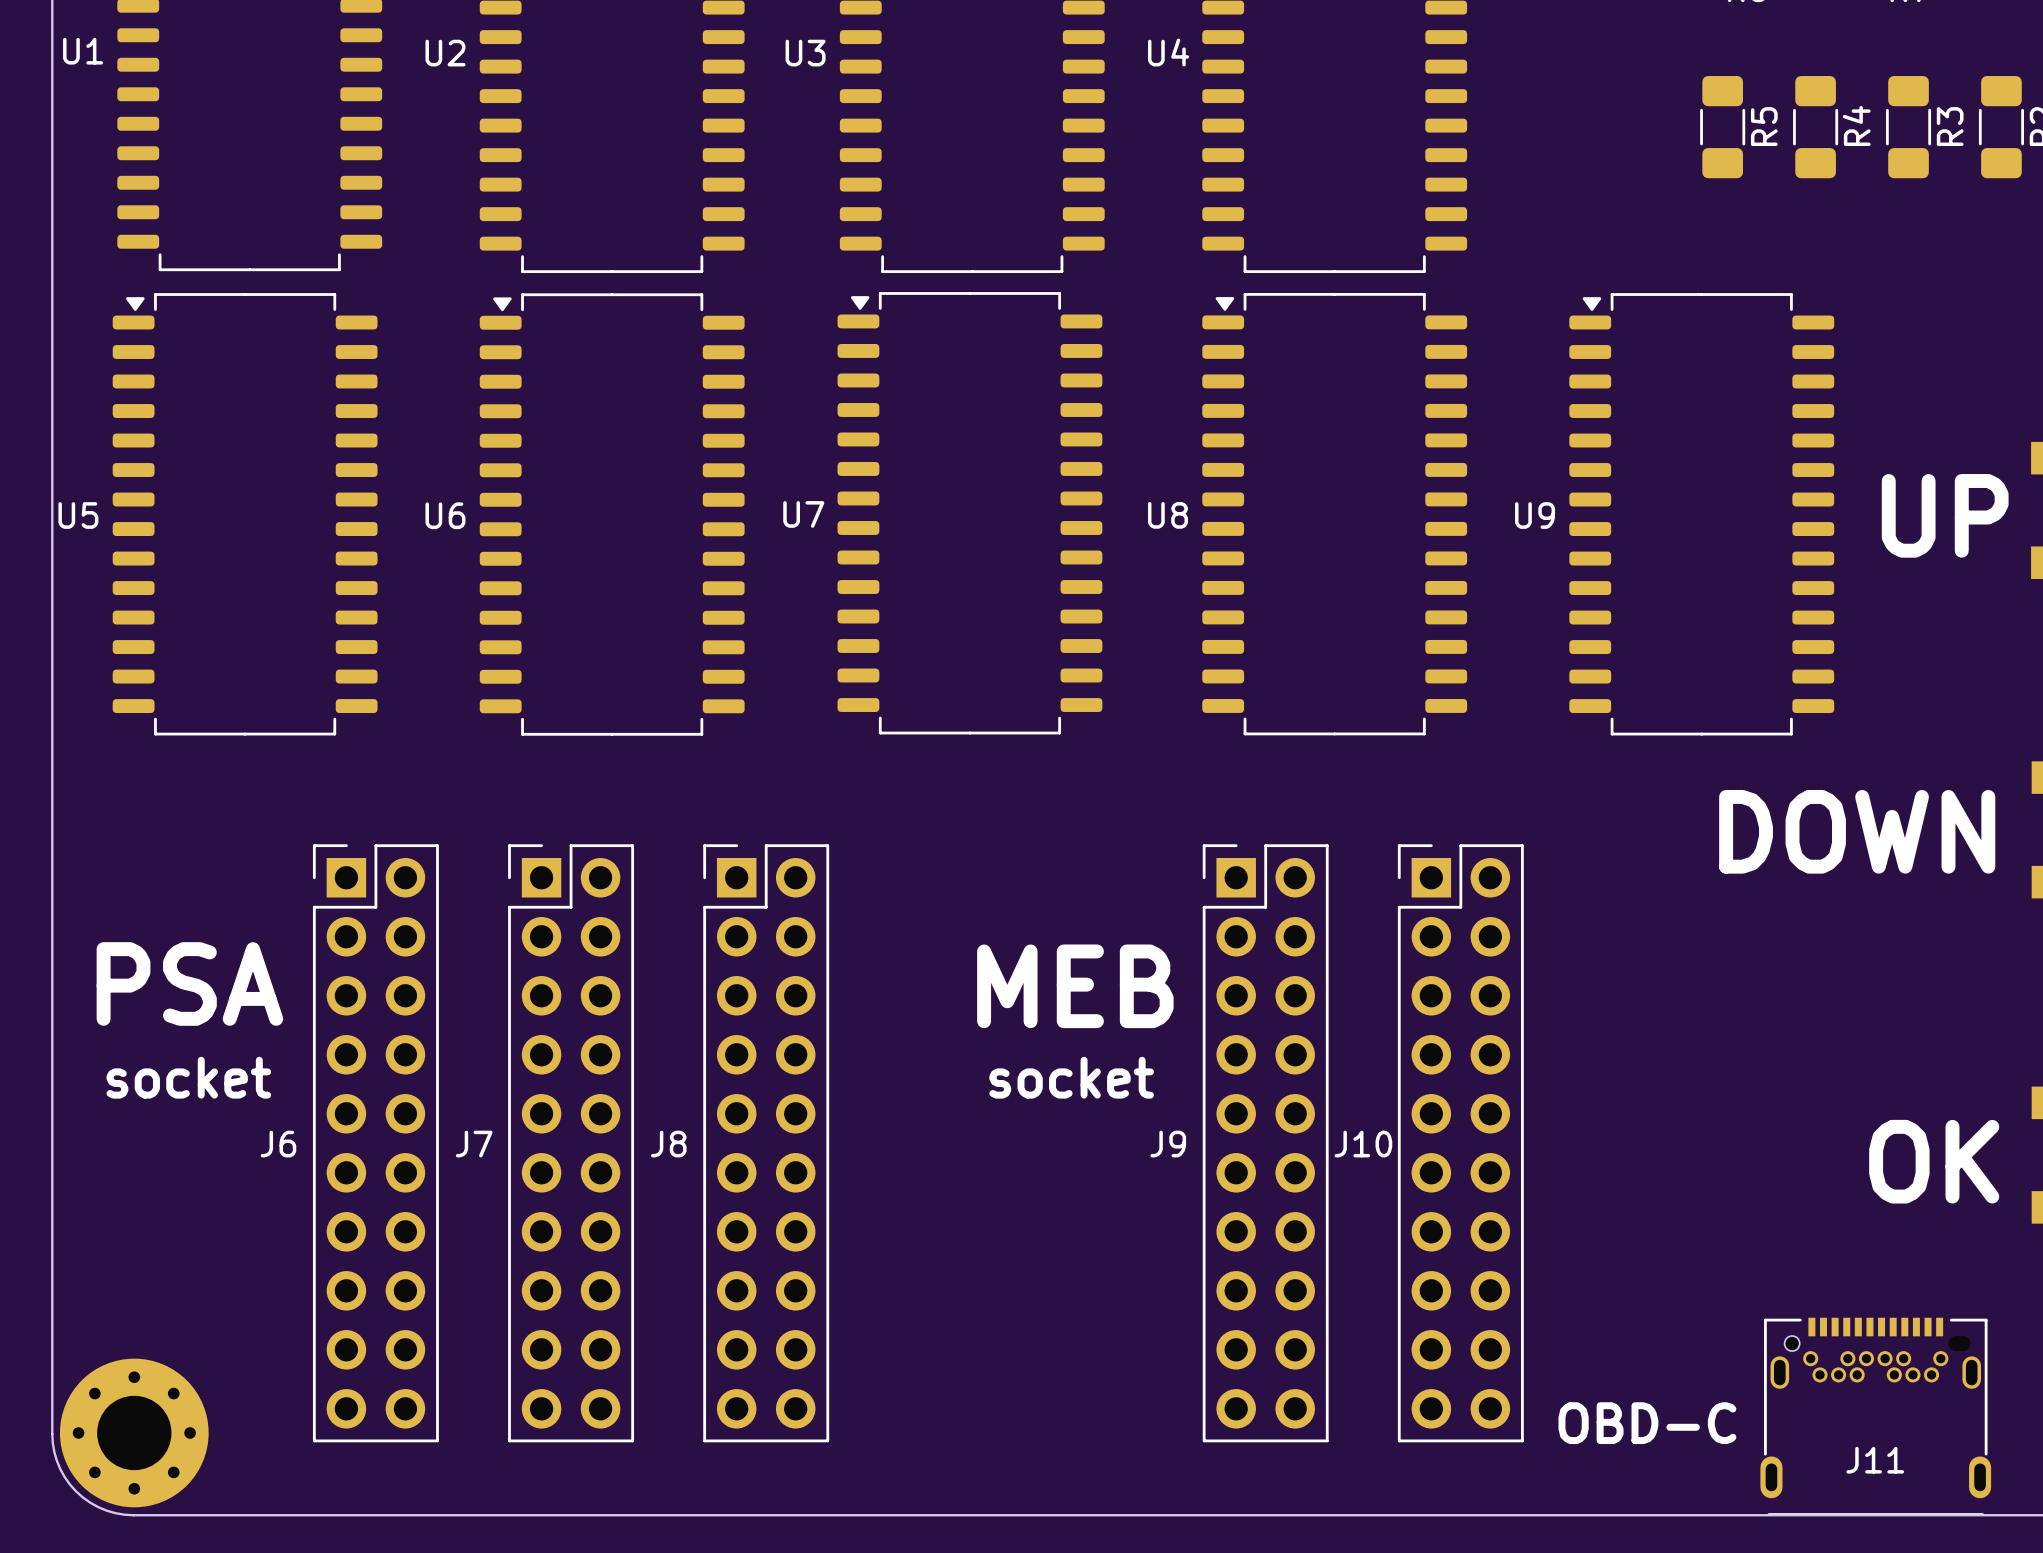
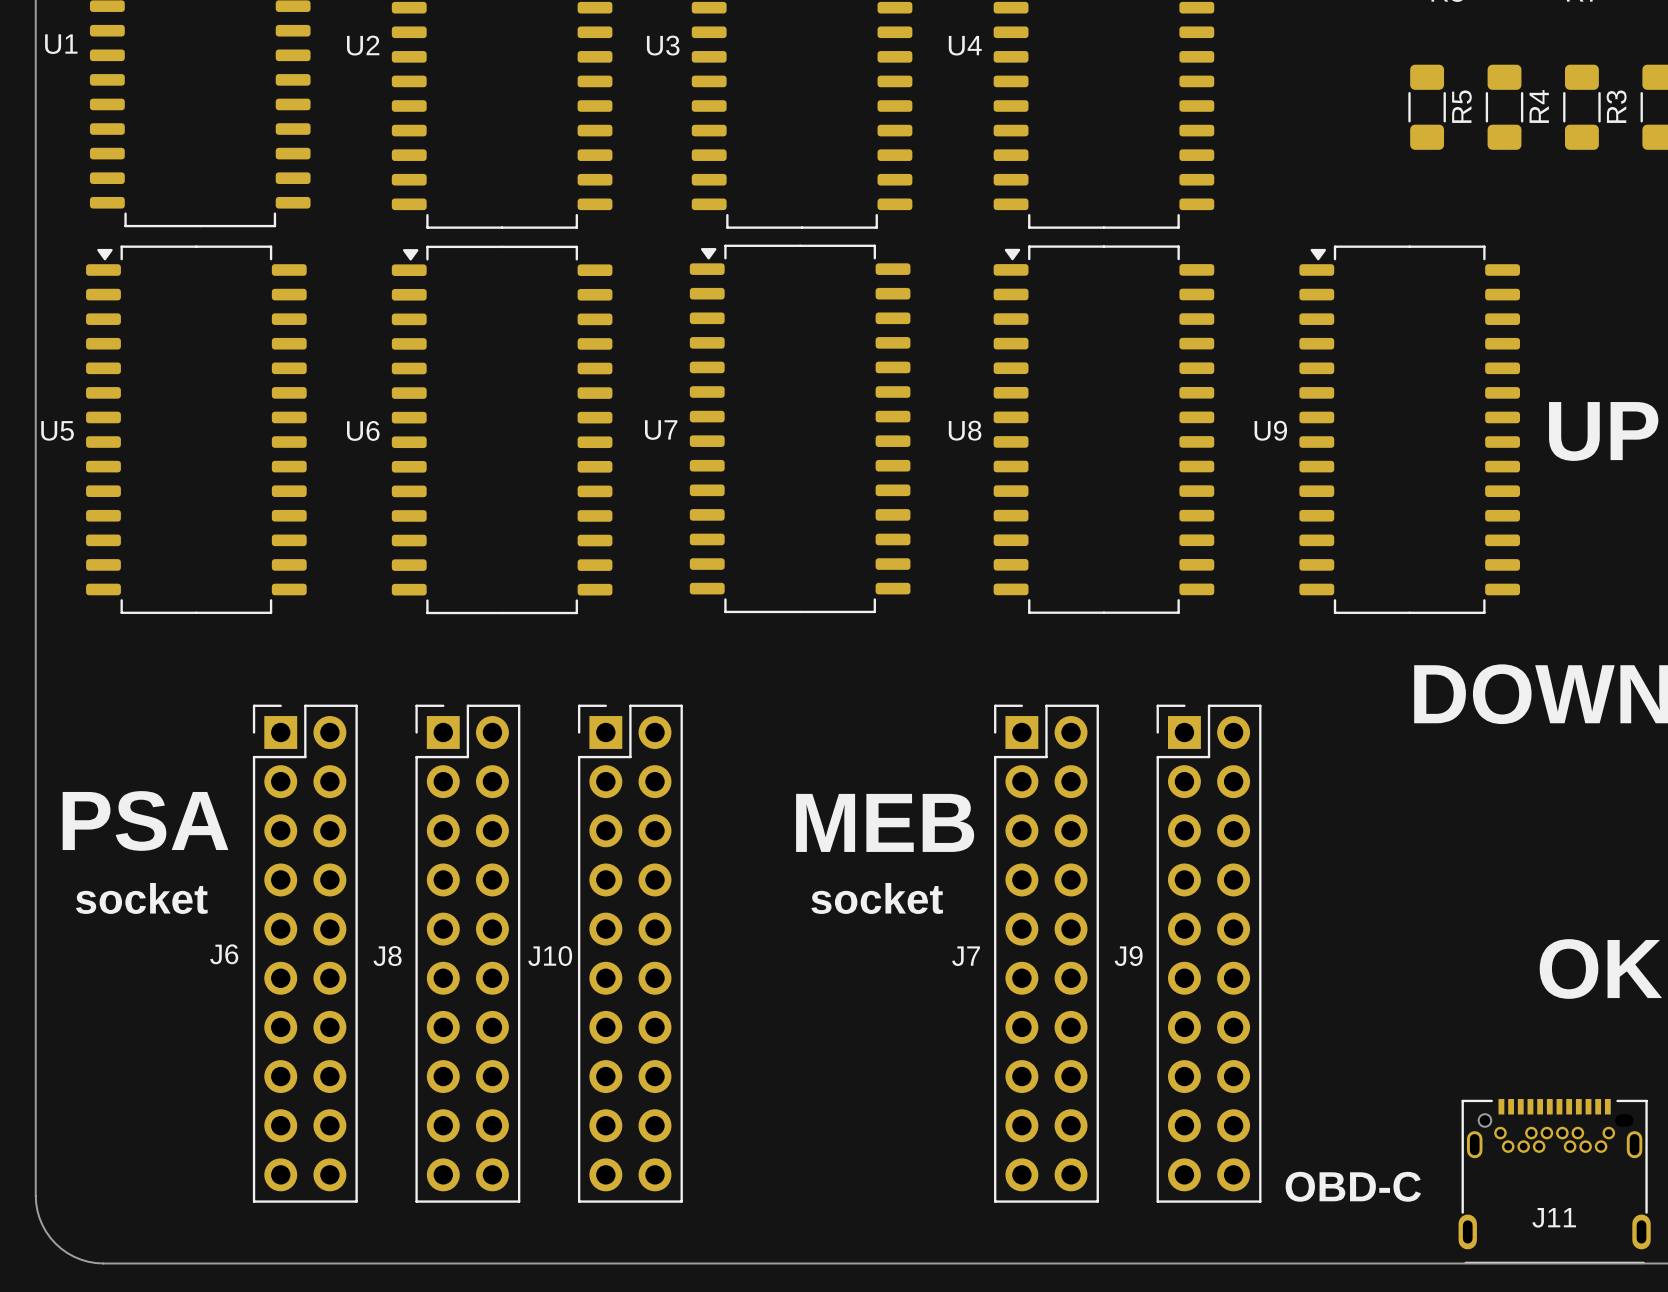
J7 name: J7 (474, 1144) -> J8 (387, 956)
J8 name: J8 (668, 1144) -> J10 (550, 956)
J9 name: J9 (1168, 1144) -> J7 (966, 956)
J10 name: J10 (1363, 1144) -> J9 (1128, 956)
part: (134, 1432) -> none

